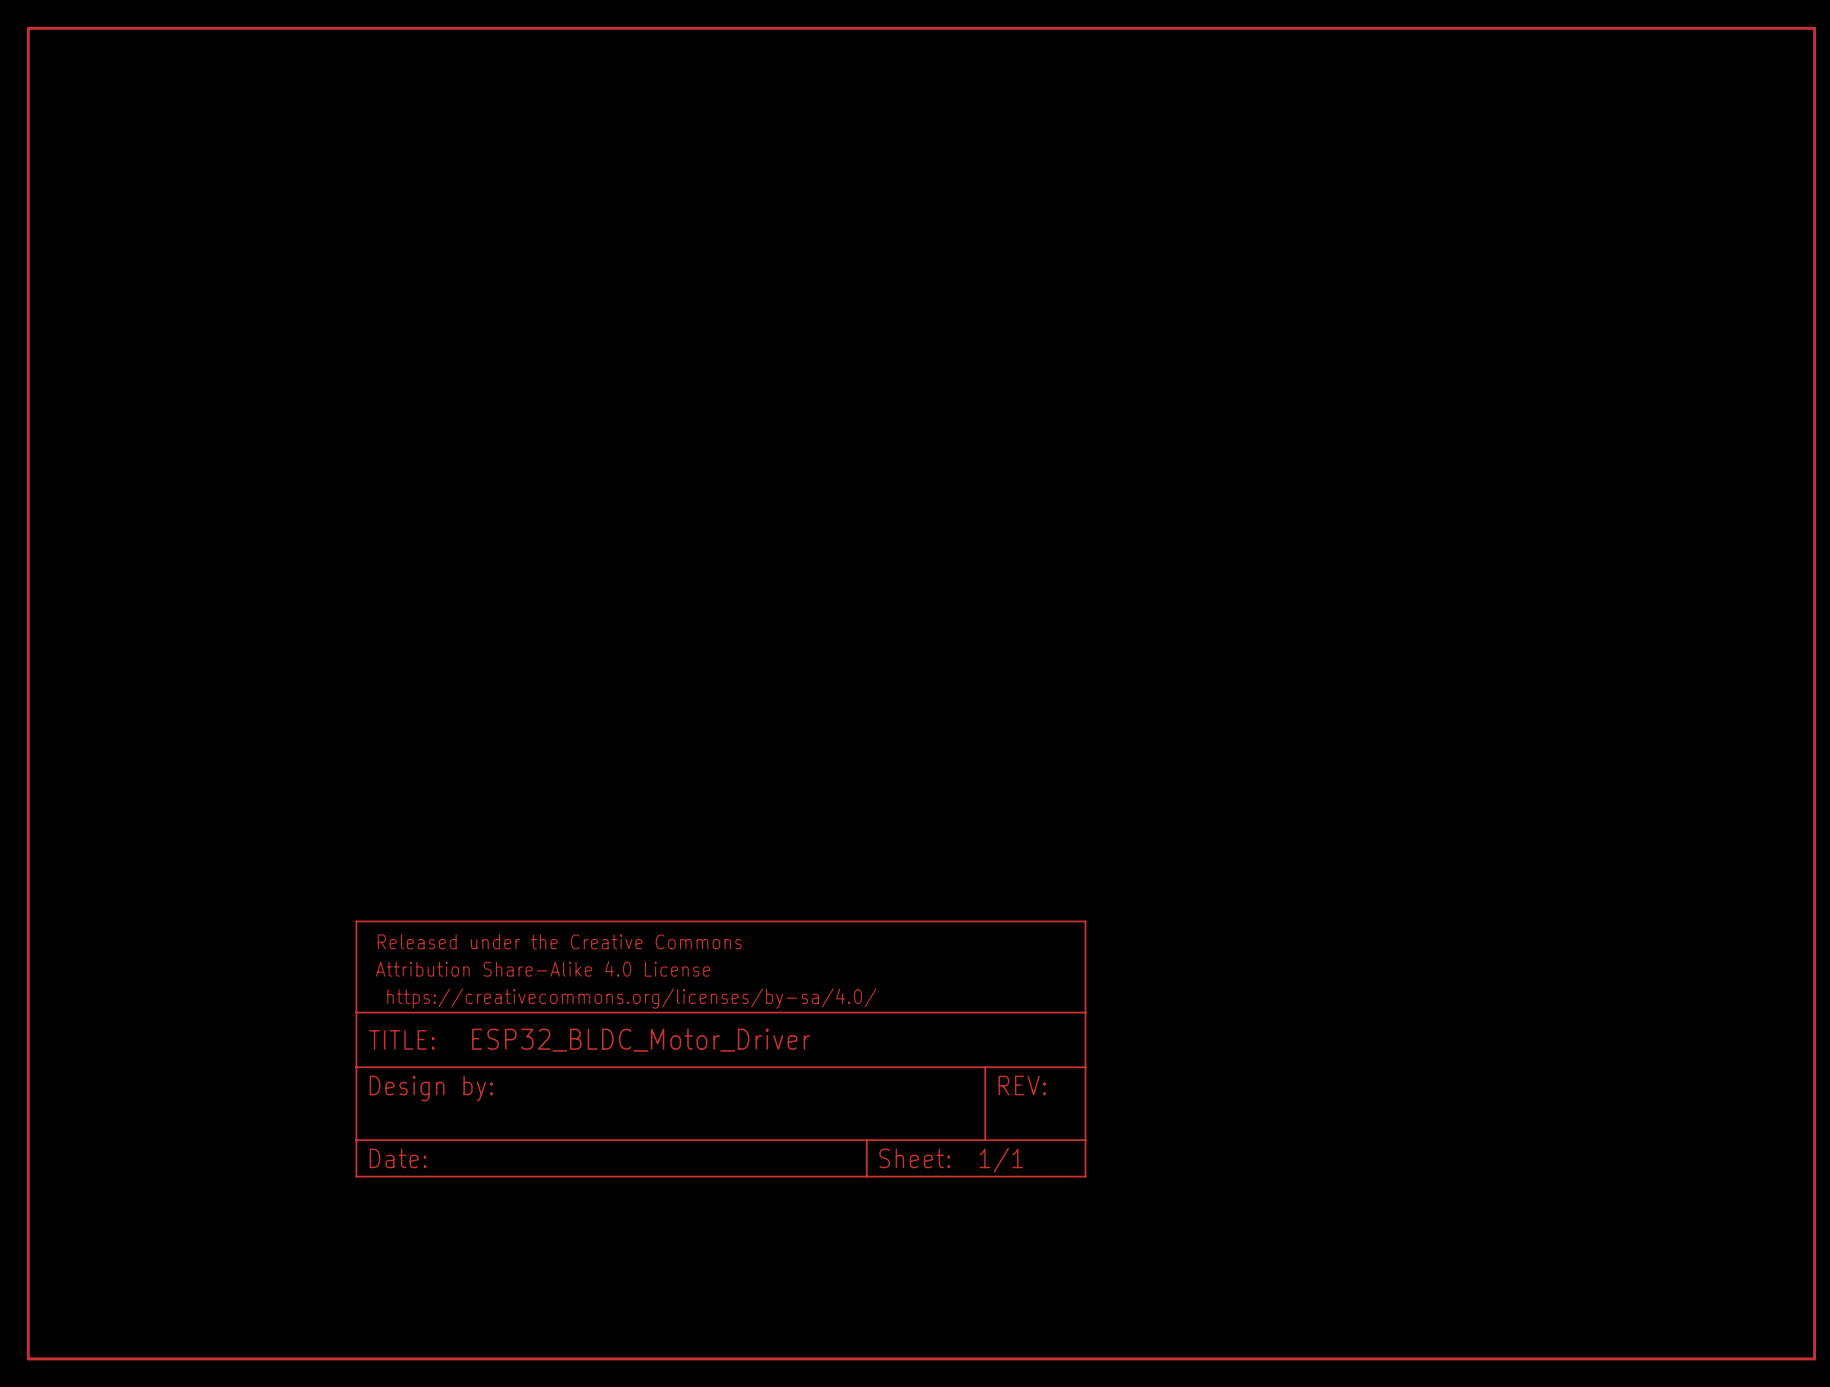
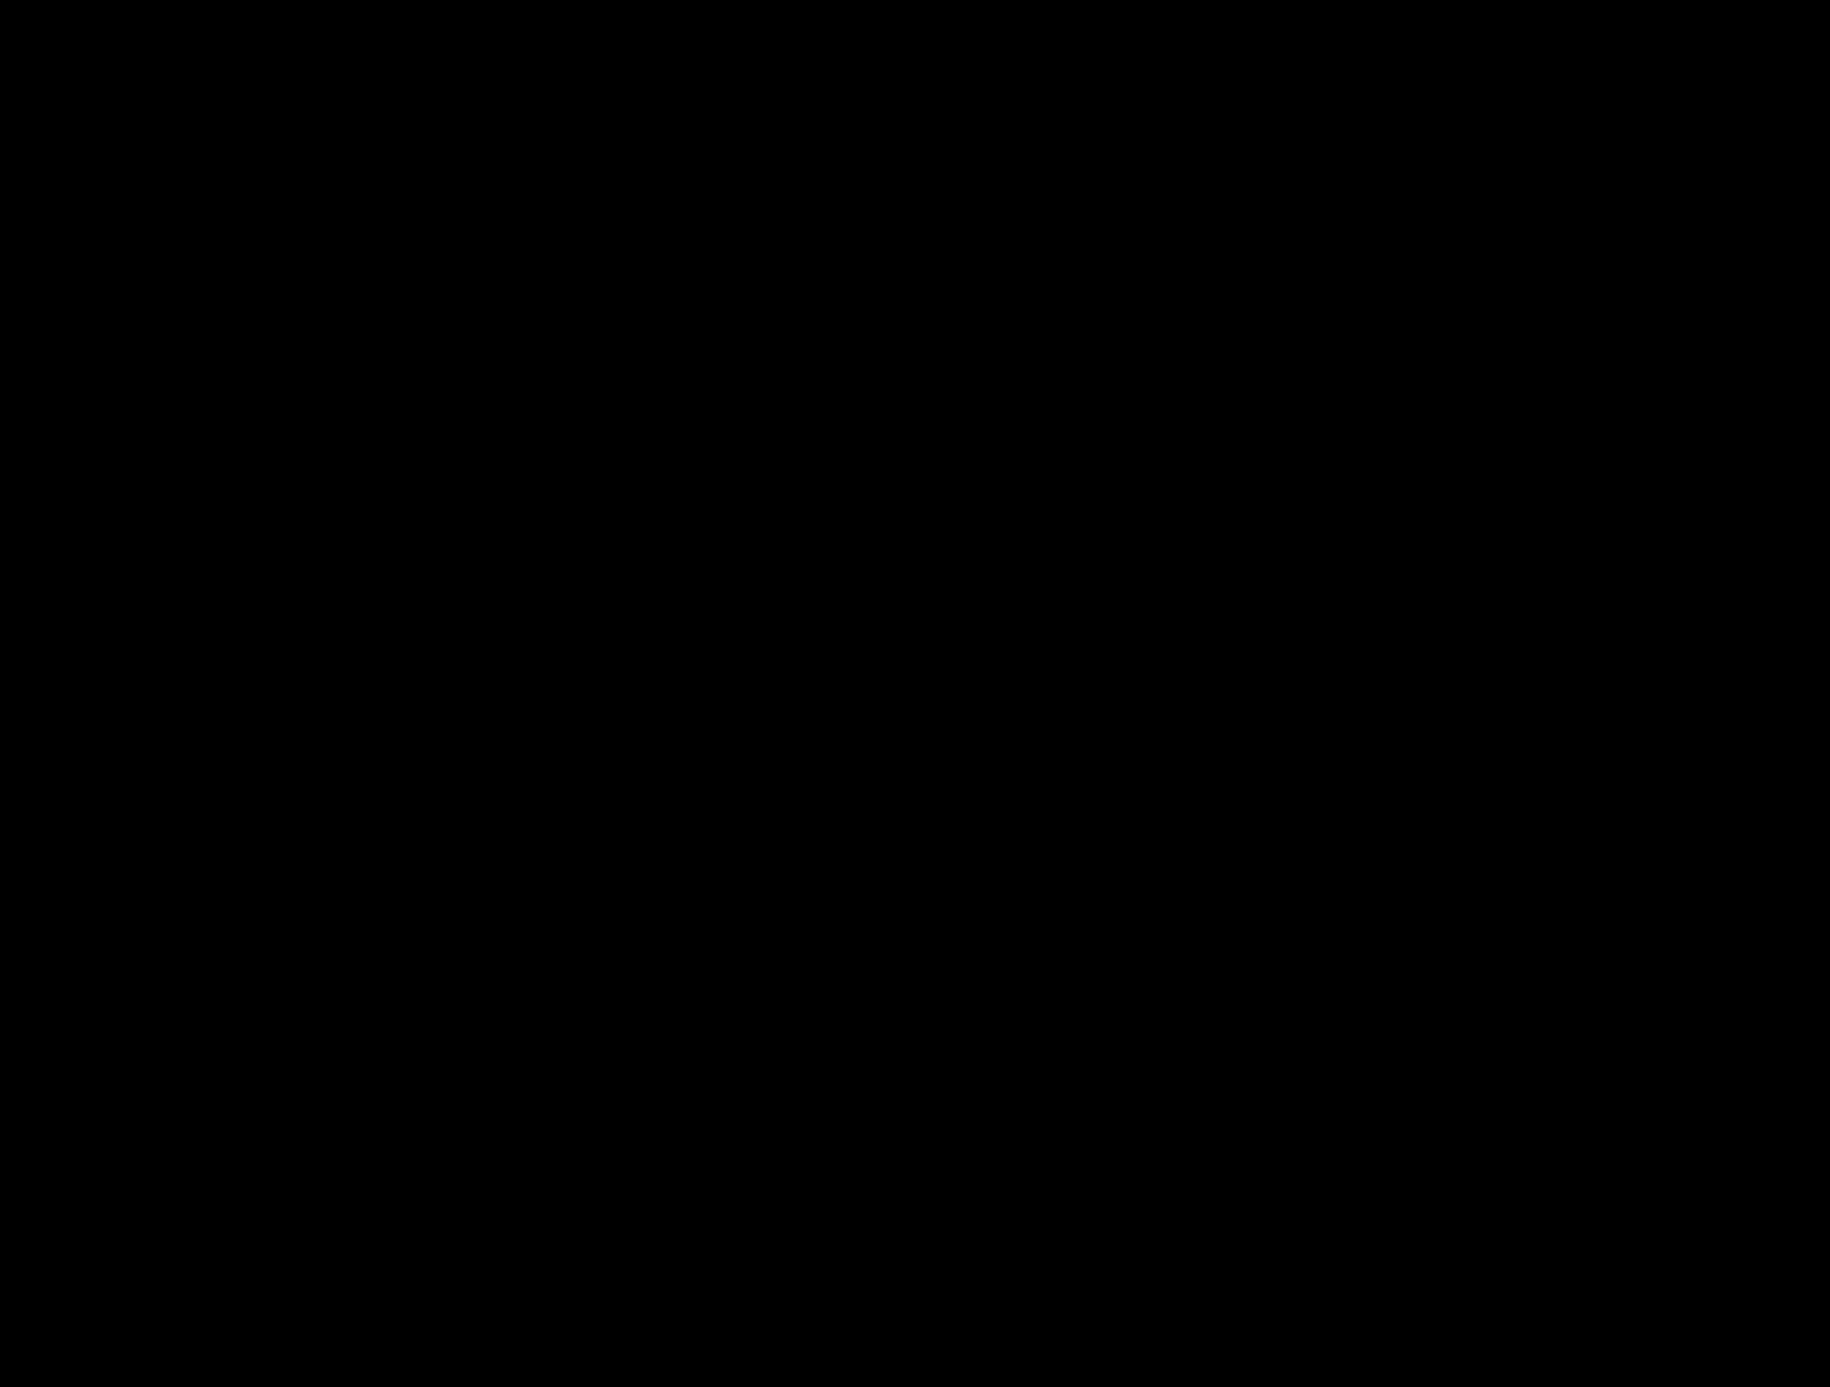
part: (921, 693) -> none
part: (720, 1049) -> none

